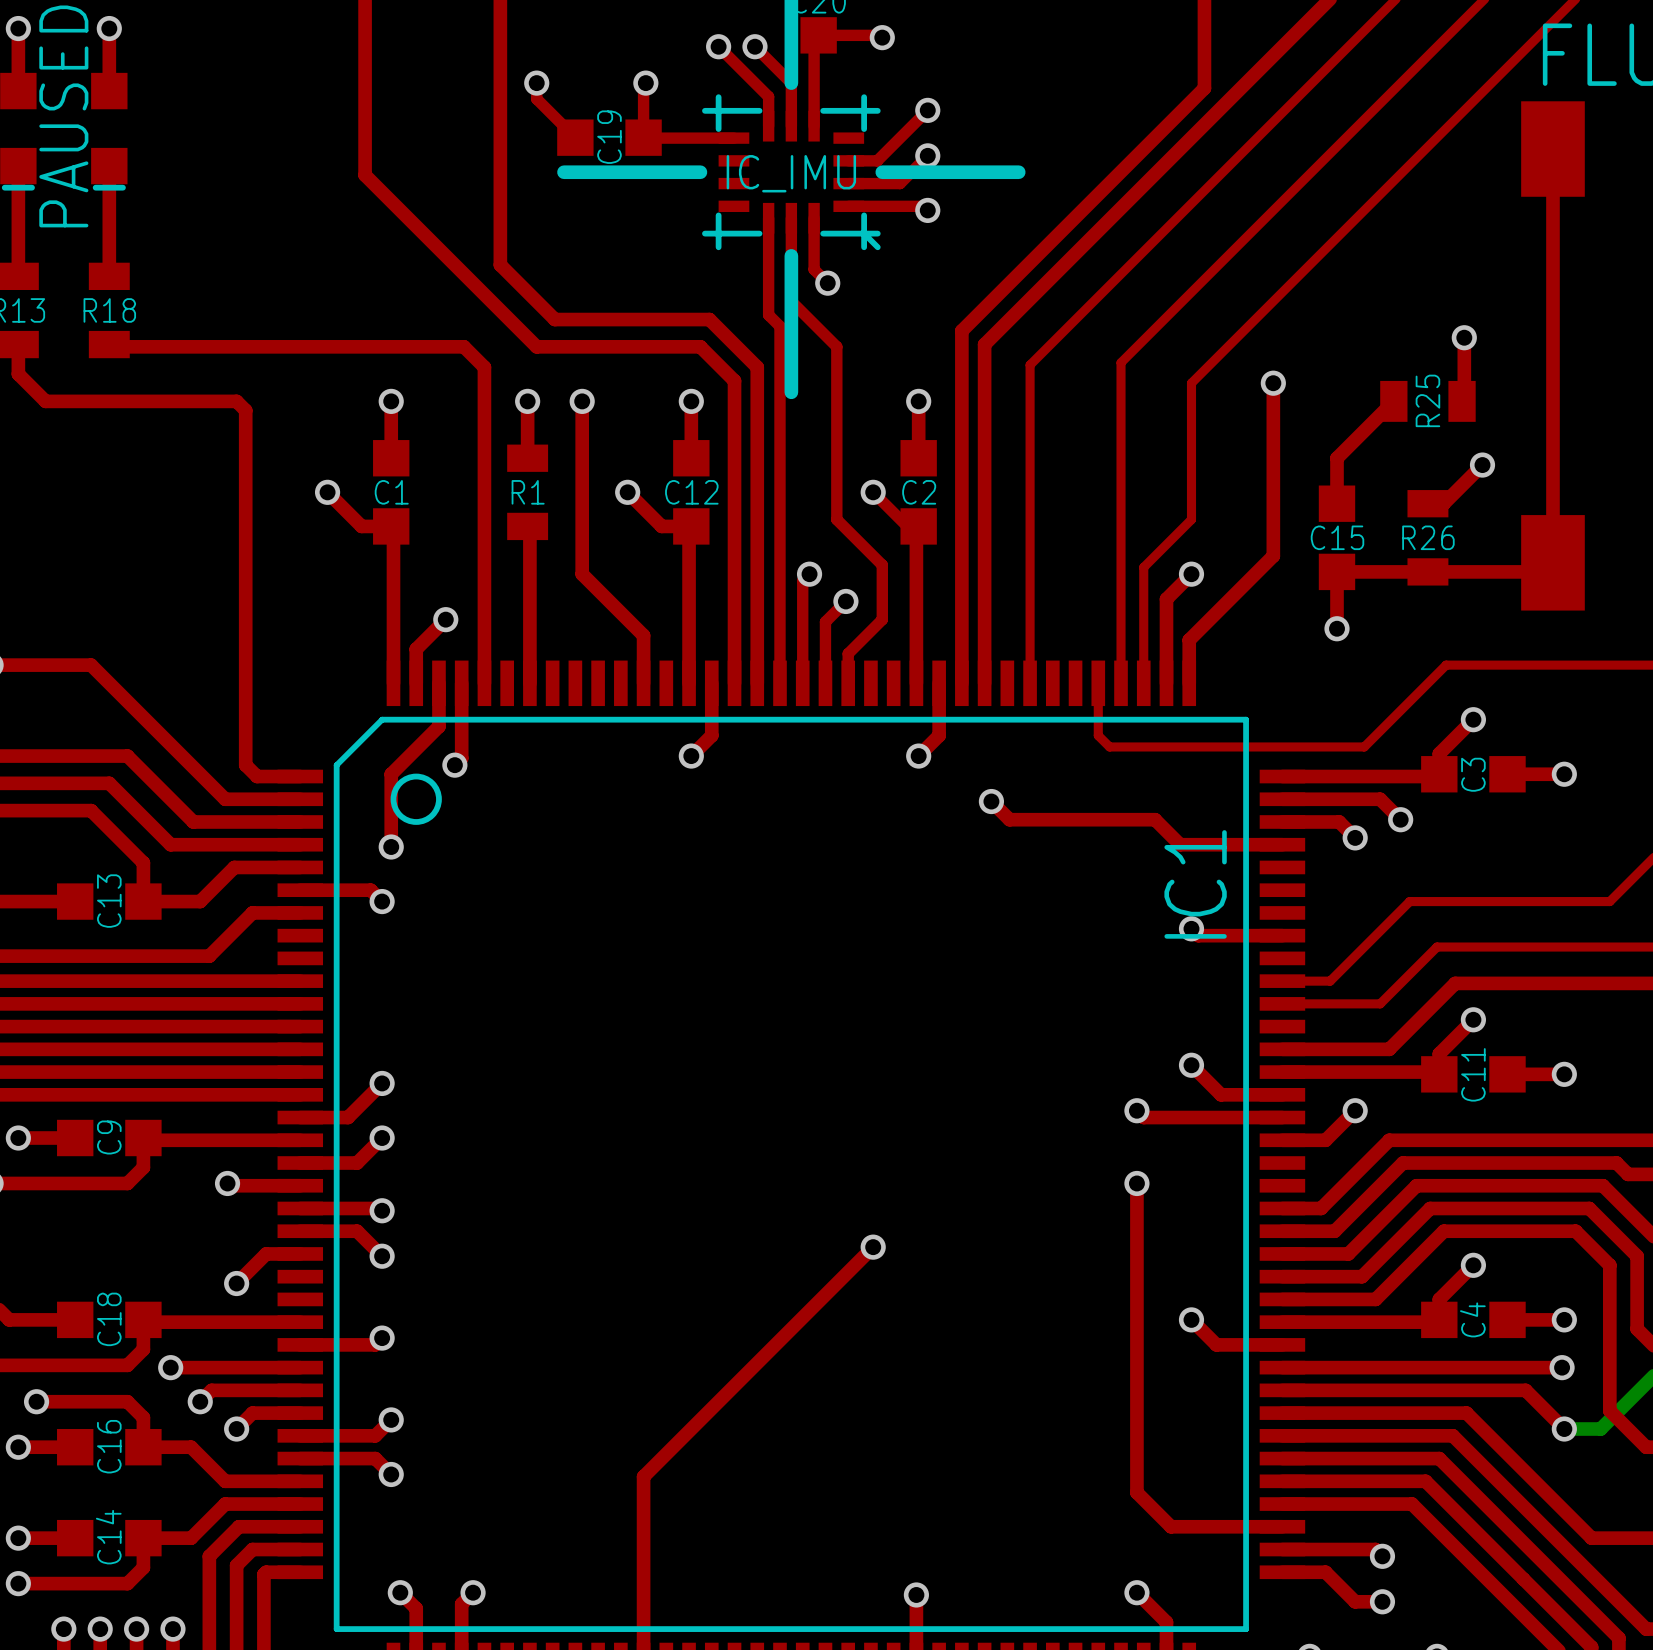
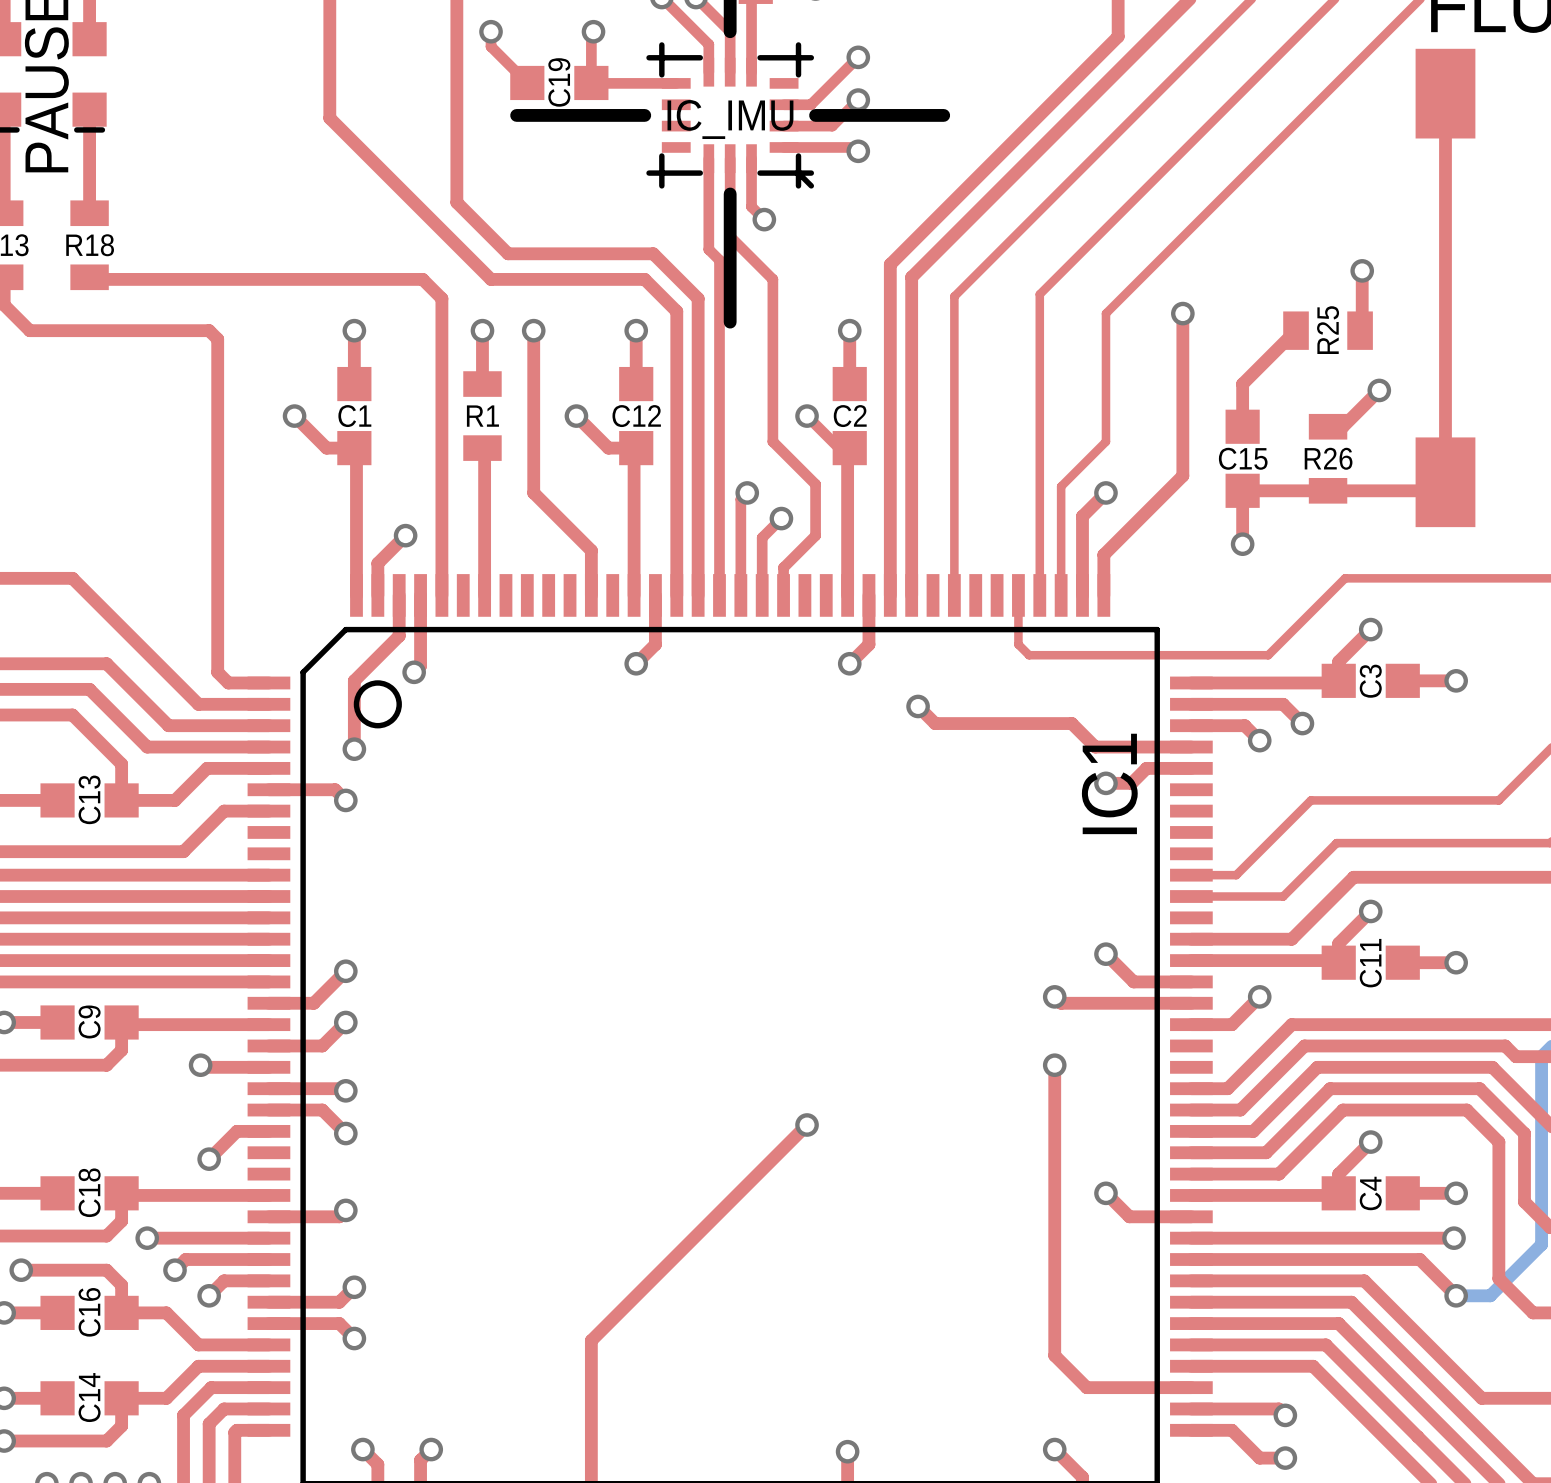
top track: none -> (1191, 768) (1146, 768) (1131, 783) (1105, 783)
top track: (1191, 928) (1198, 935) (1282, 935) -> none
via position: (1191, 928) -> (1105, 783)

